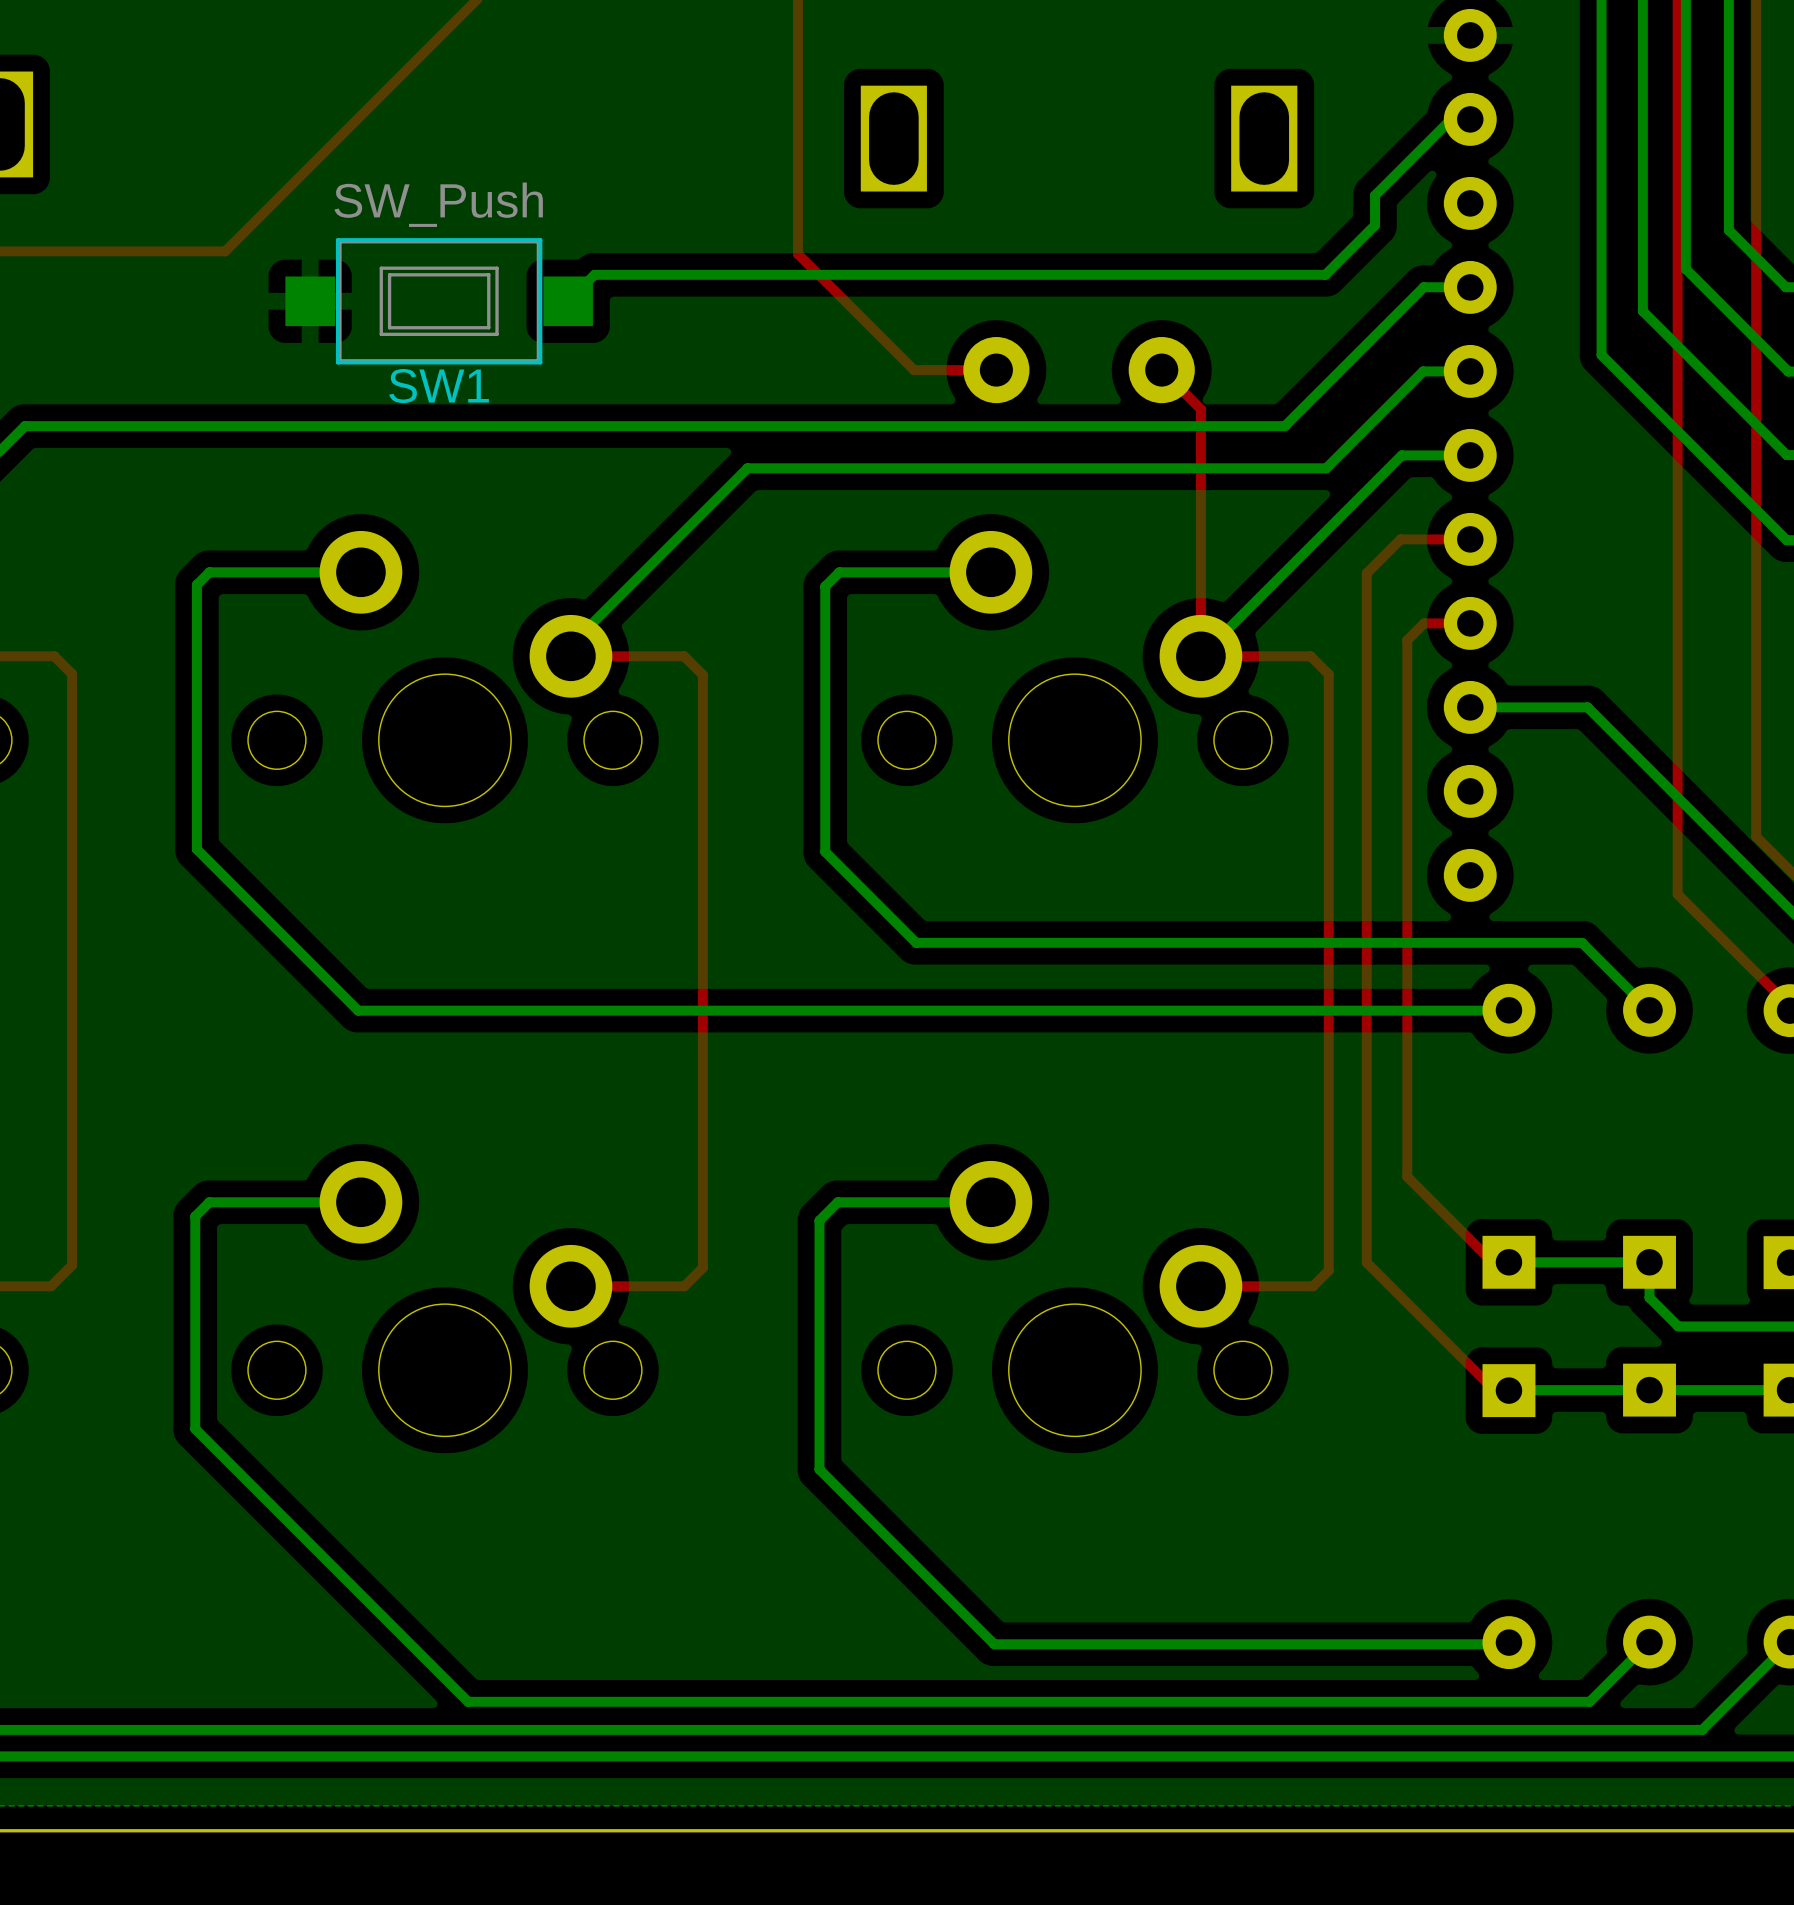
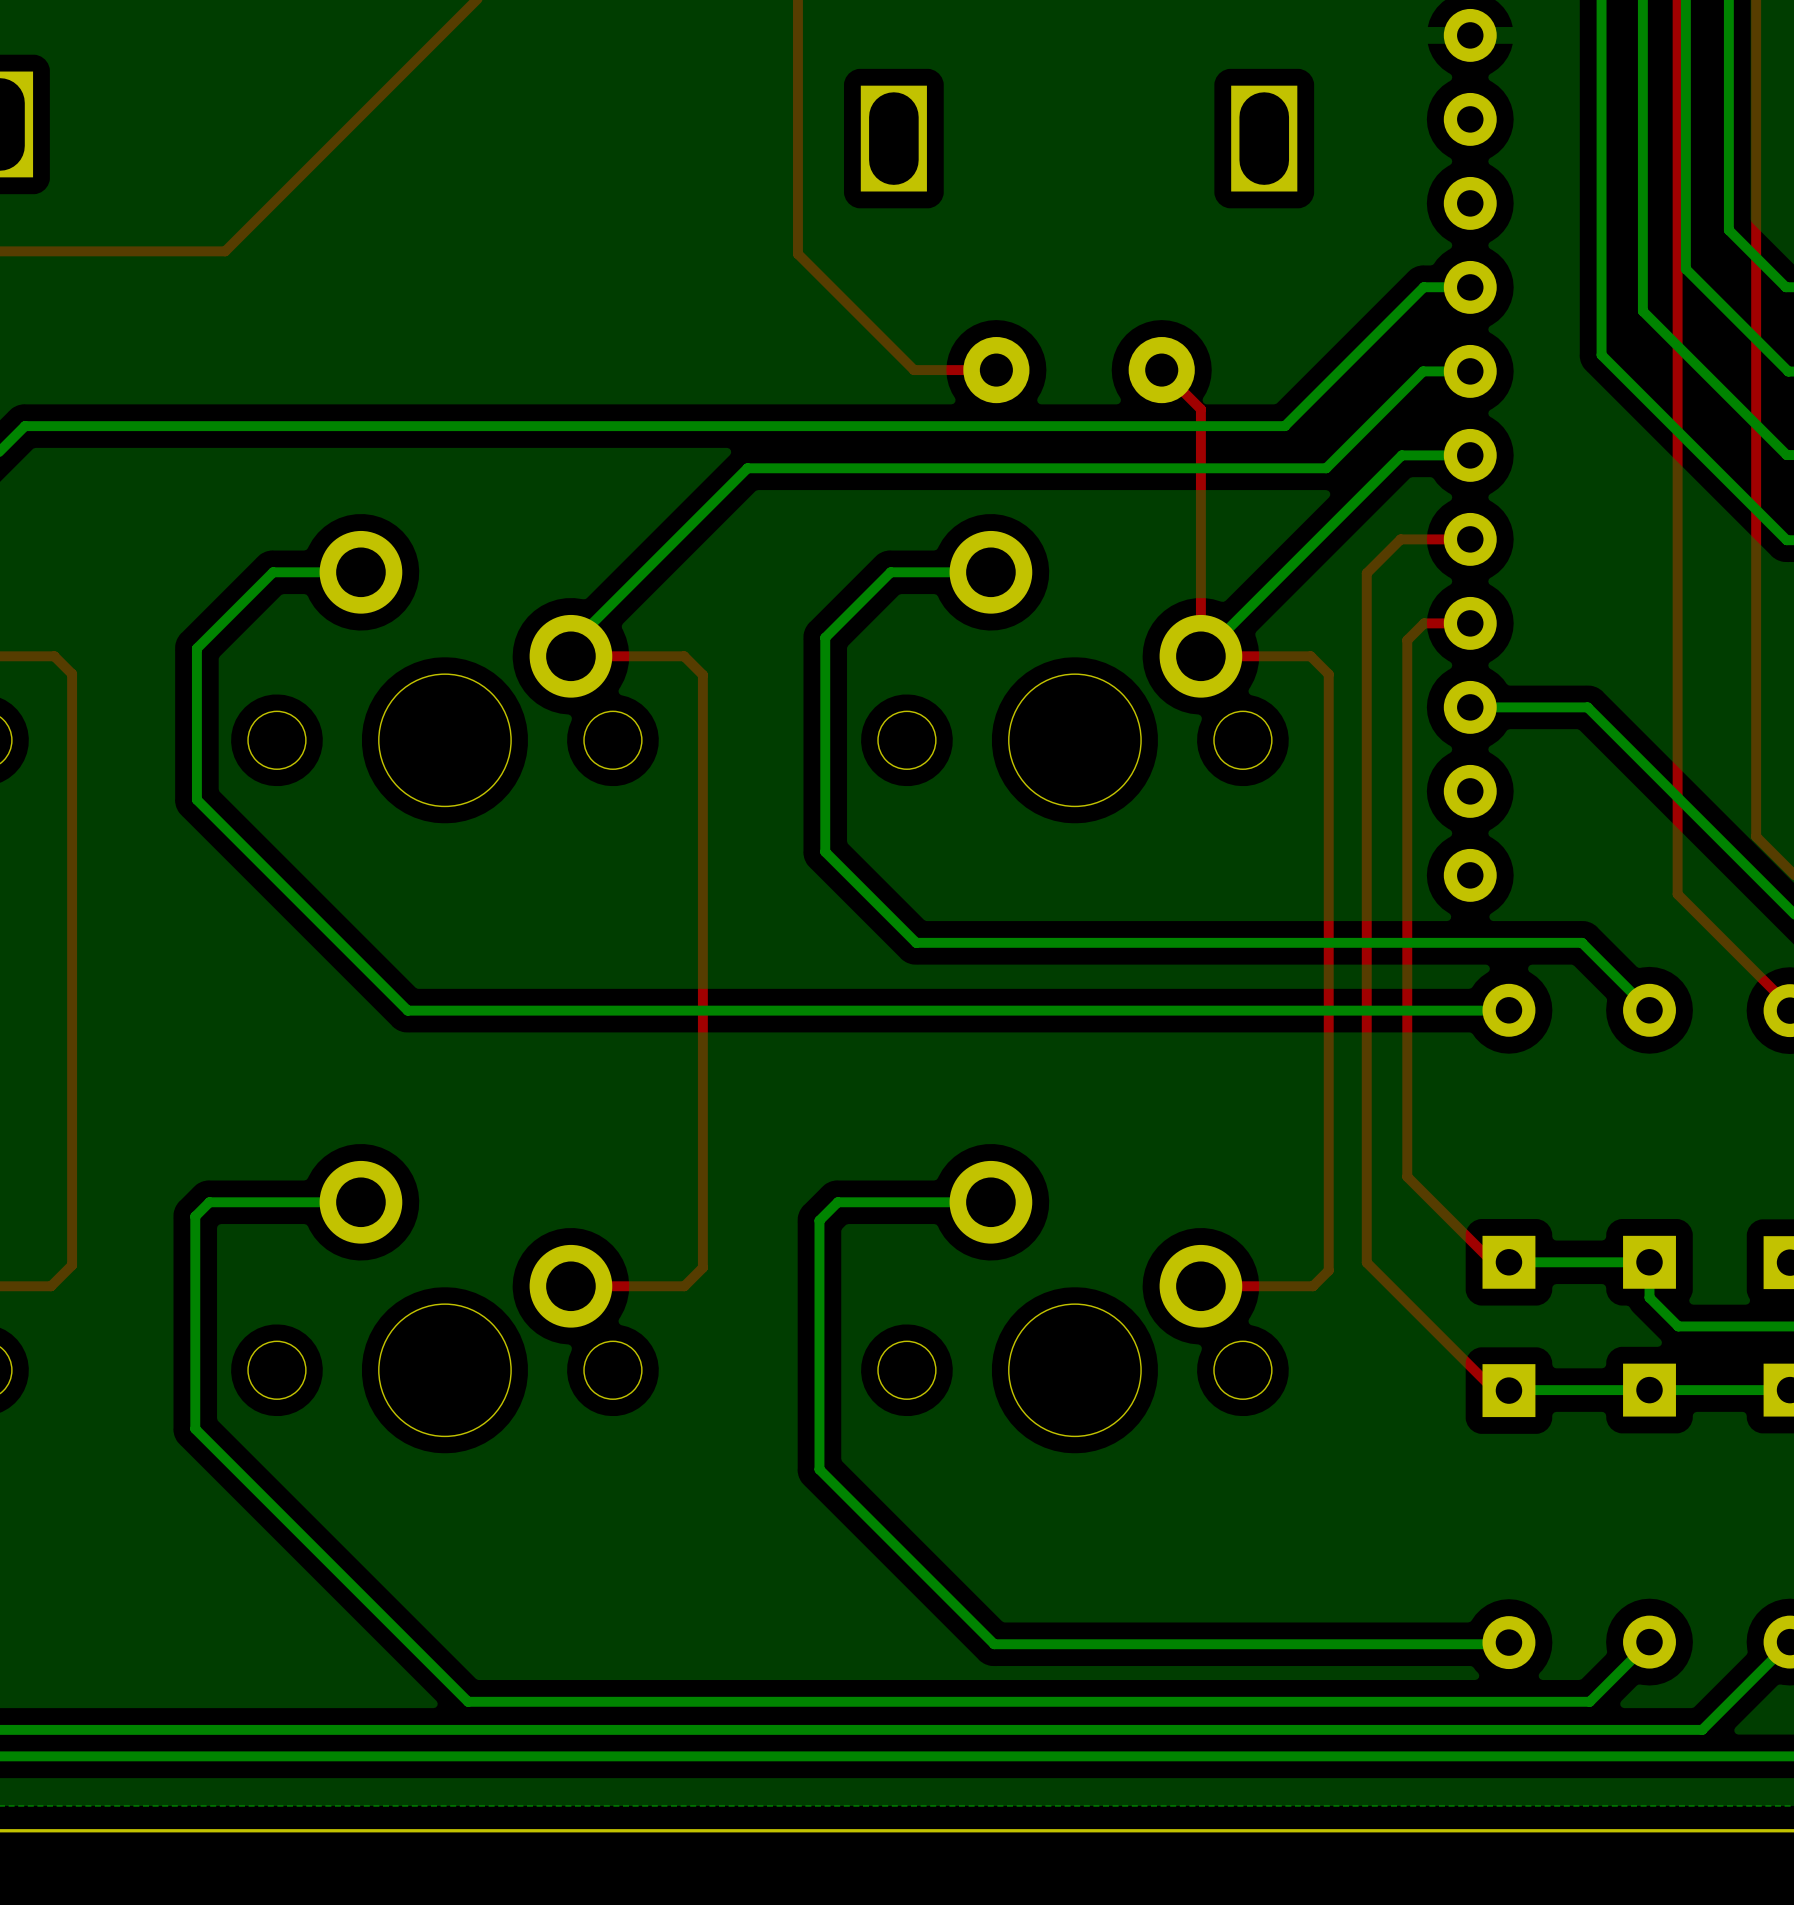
bottom track: (1470, 119) (1451, 119) (1375, 195) (1375, 225) (1325, 274) (594, 274) (568, 301) -> none
SW1: SW_Push (439, 301) -> none
bottom track: (273, 572) (209, 572) (196, 584) (196, 648) -> (273, 572) (196, 648)
bottom track: (890, 572) (839, 572) (825, 586) (825, 637) -> (890, 572) (825, 637)
bottom track: (196, 799) (196, 849) (358, 1010) (407, 1010) -> (196, 799) (407, 1010)

